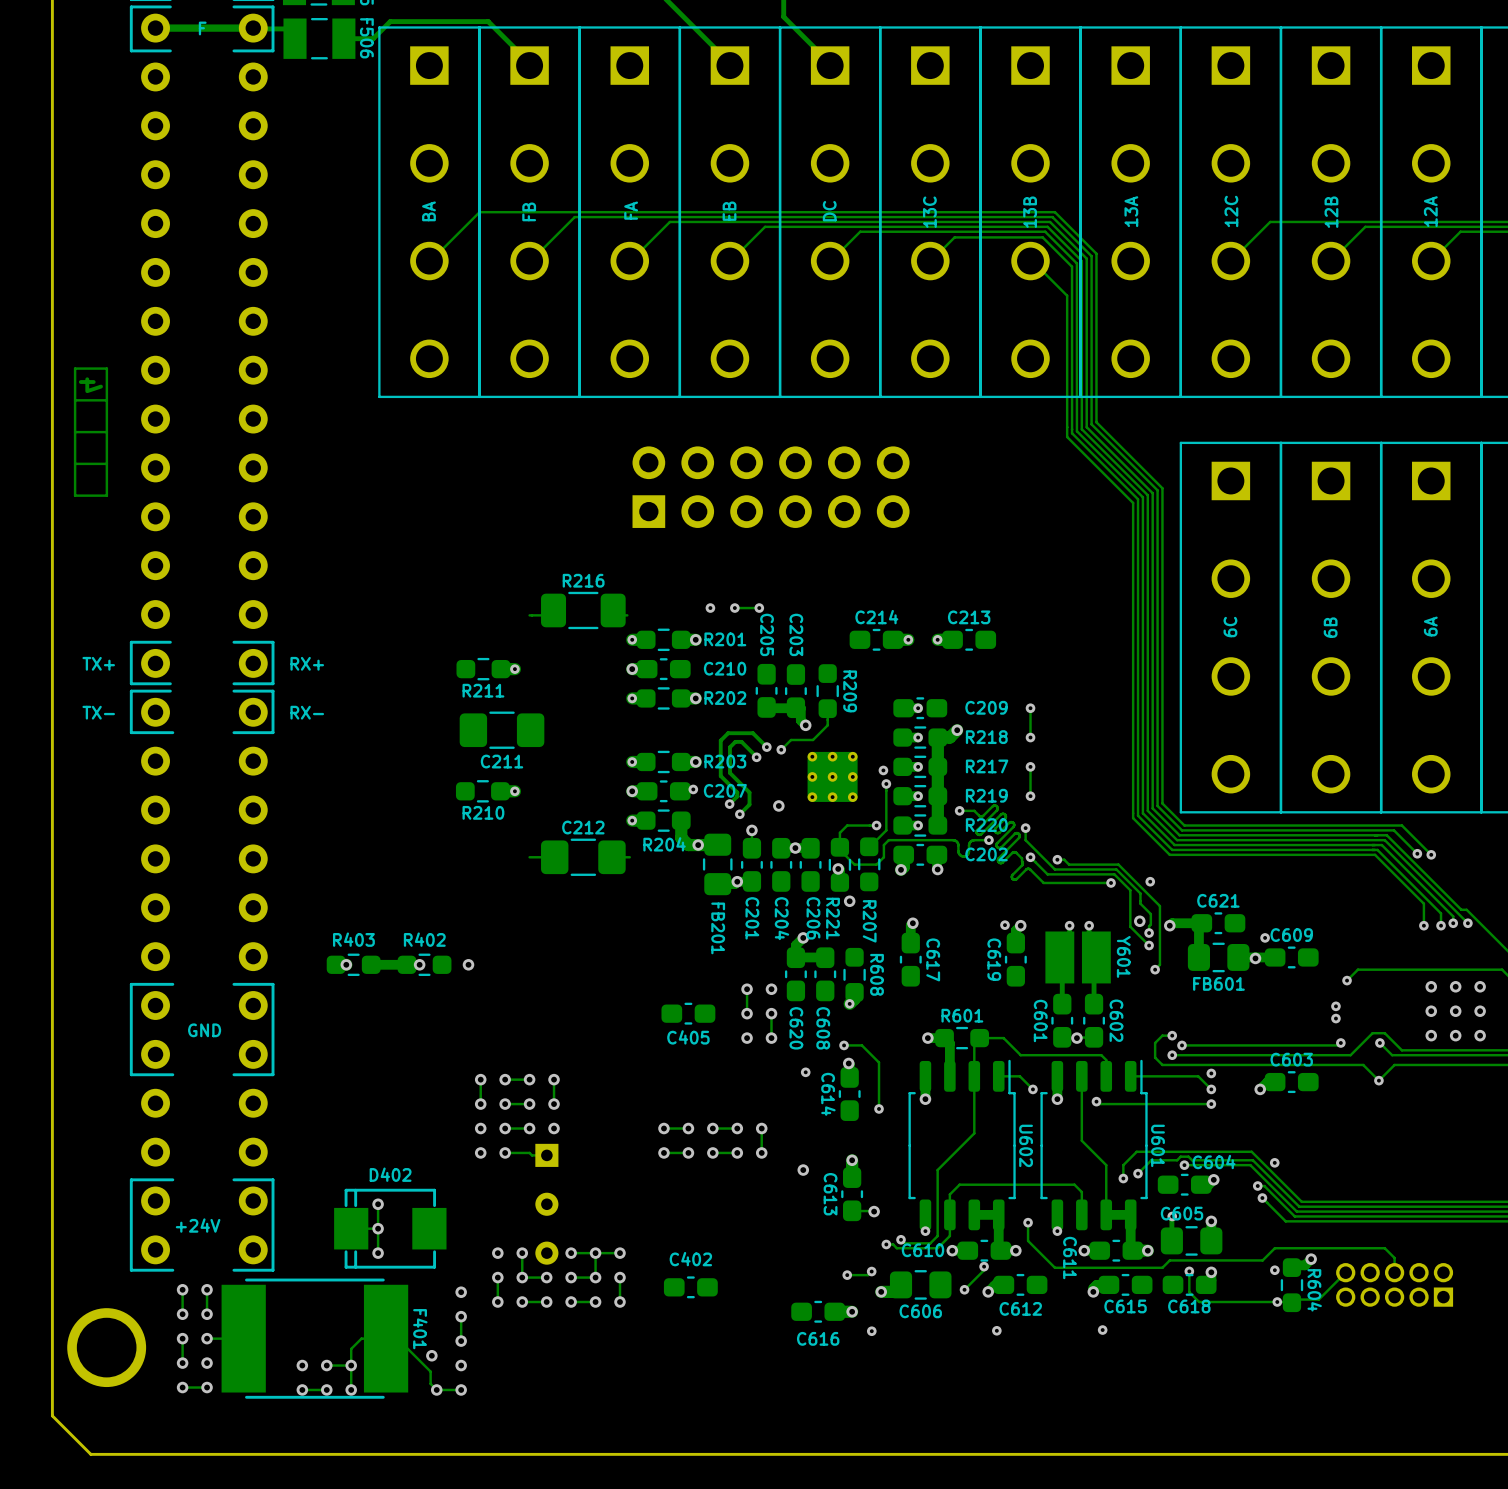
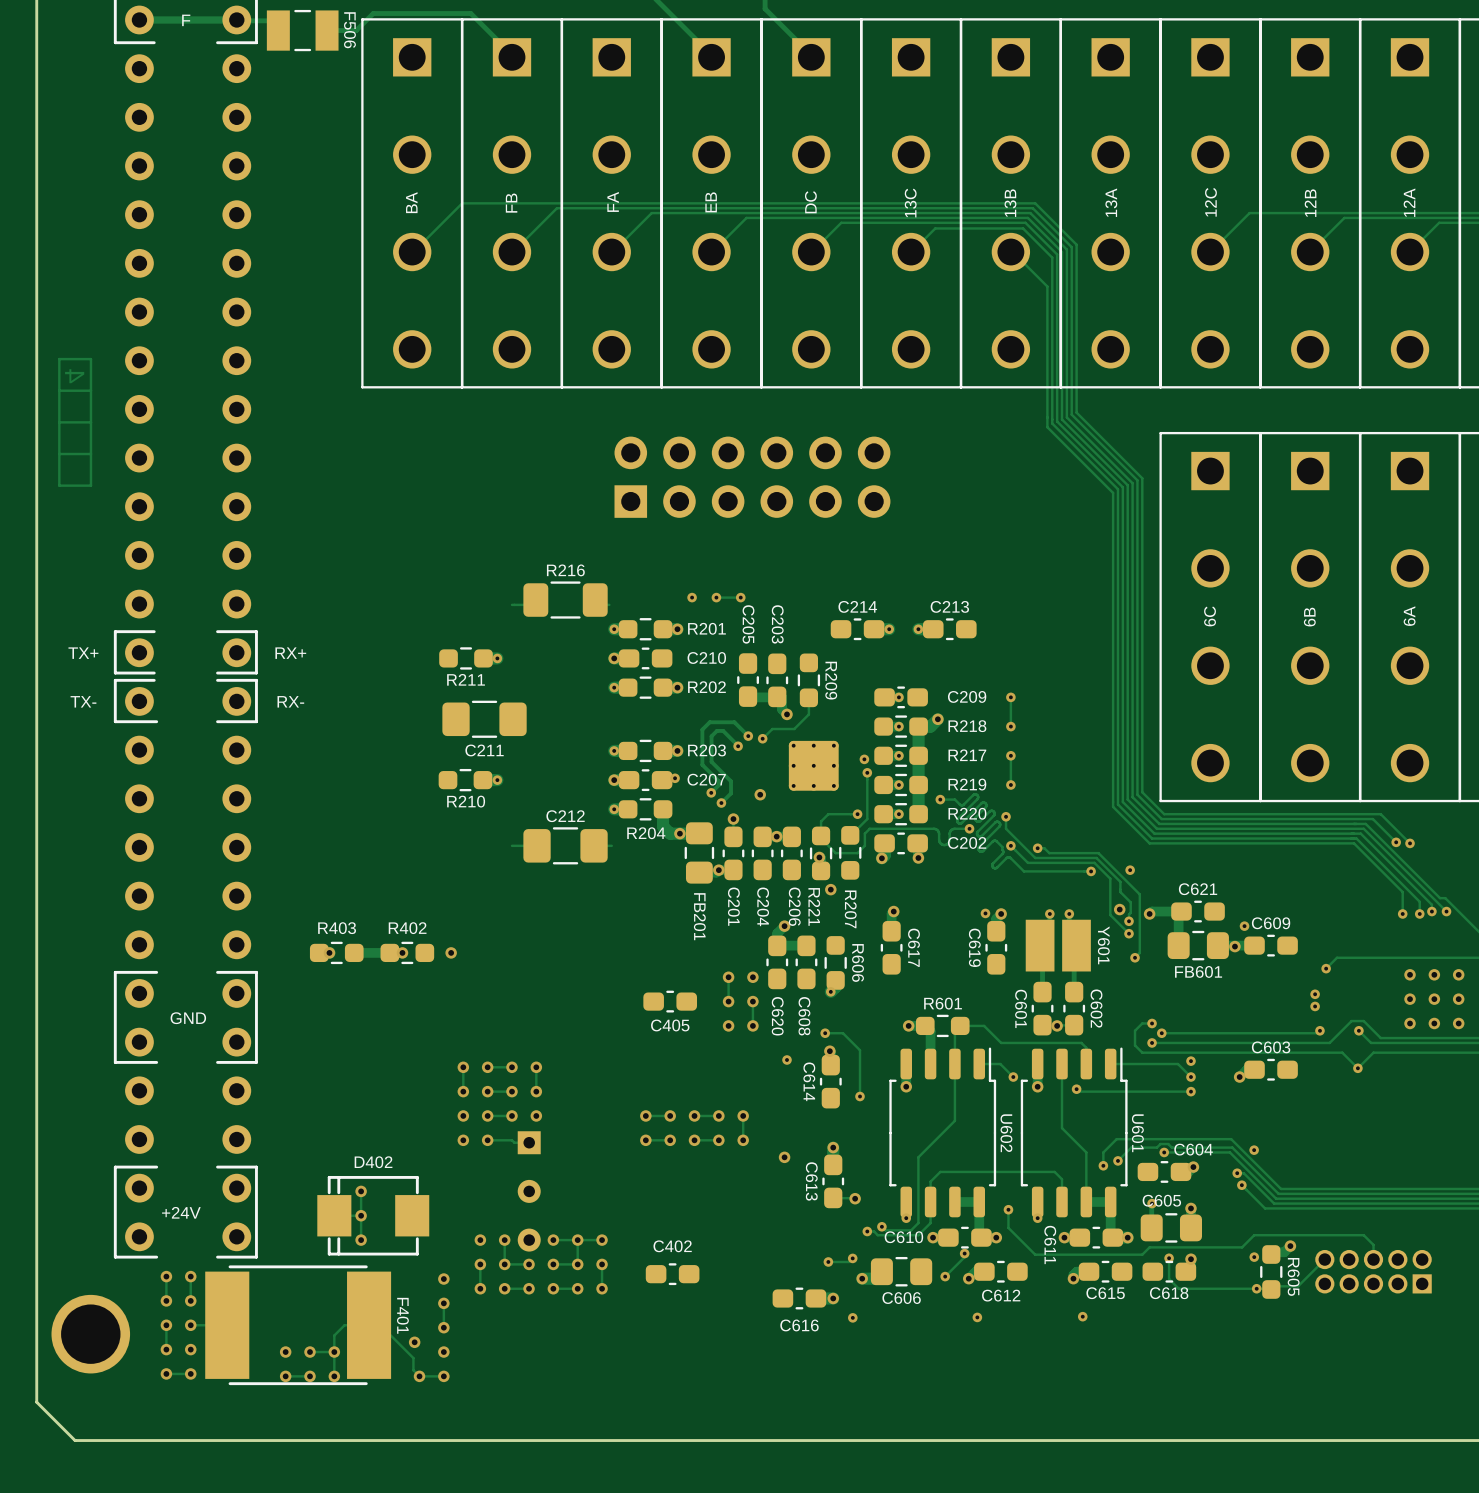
R608 name: R608 (877, 974) -> R606 (858, 962)
R604 name: R604 (1314, 1290) -> R605 (1293, 1276)

